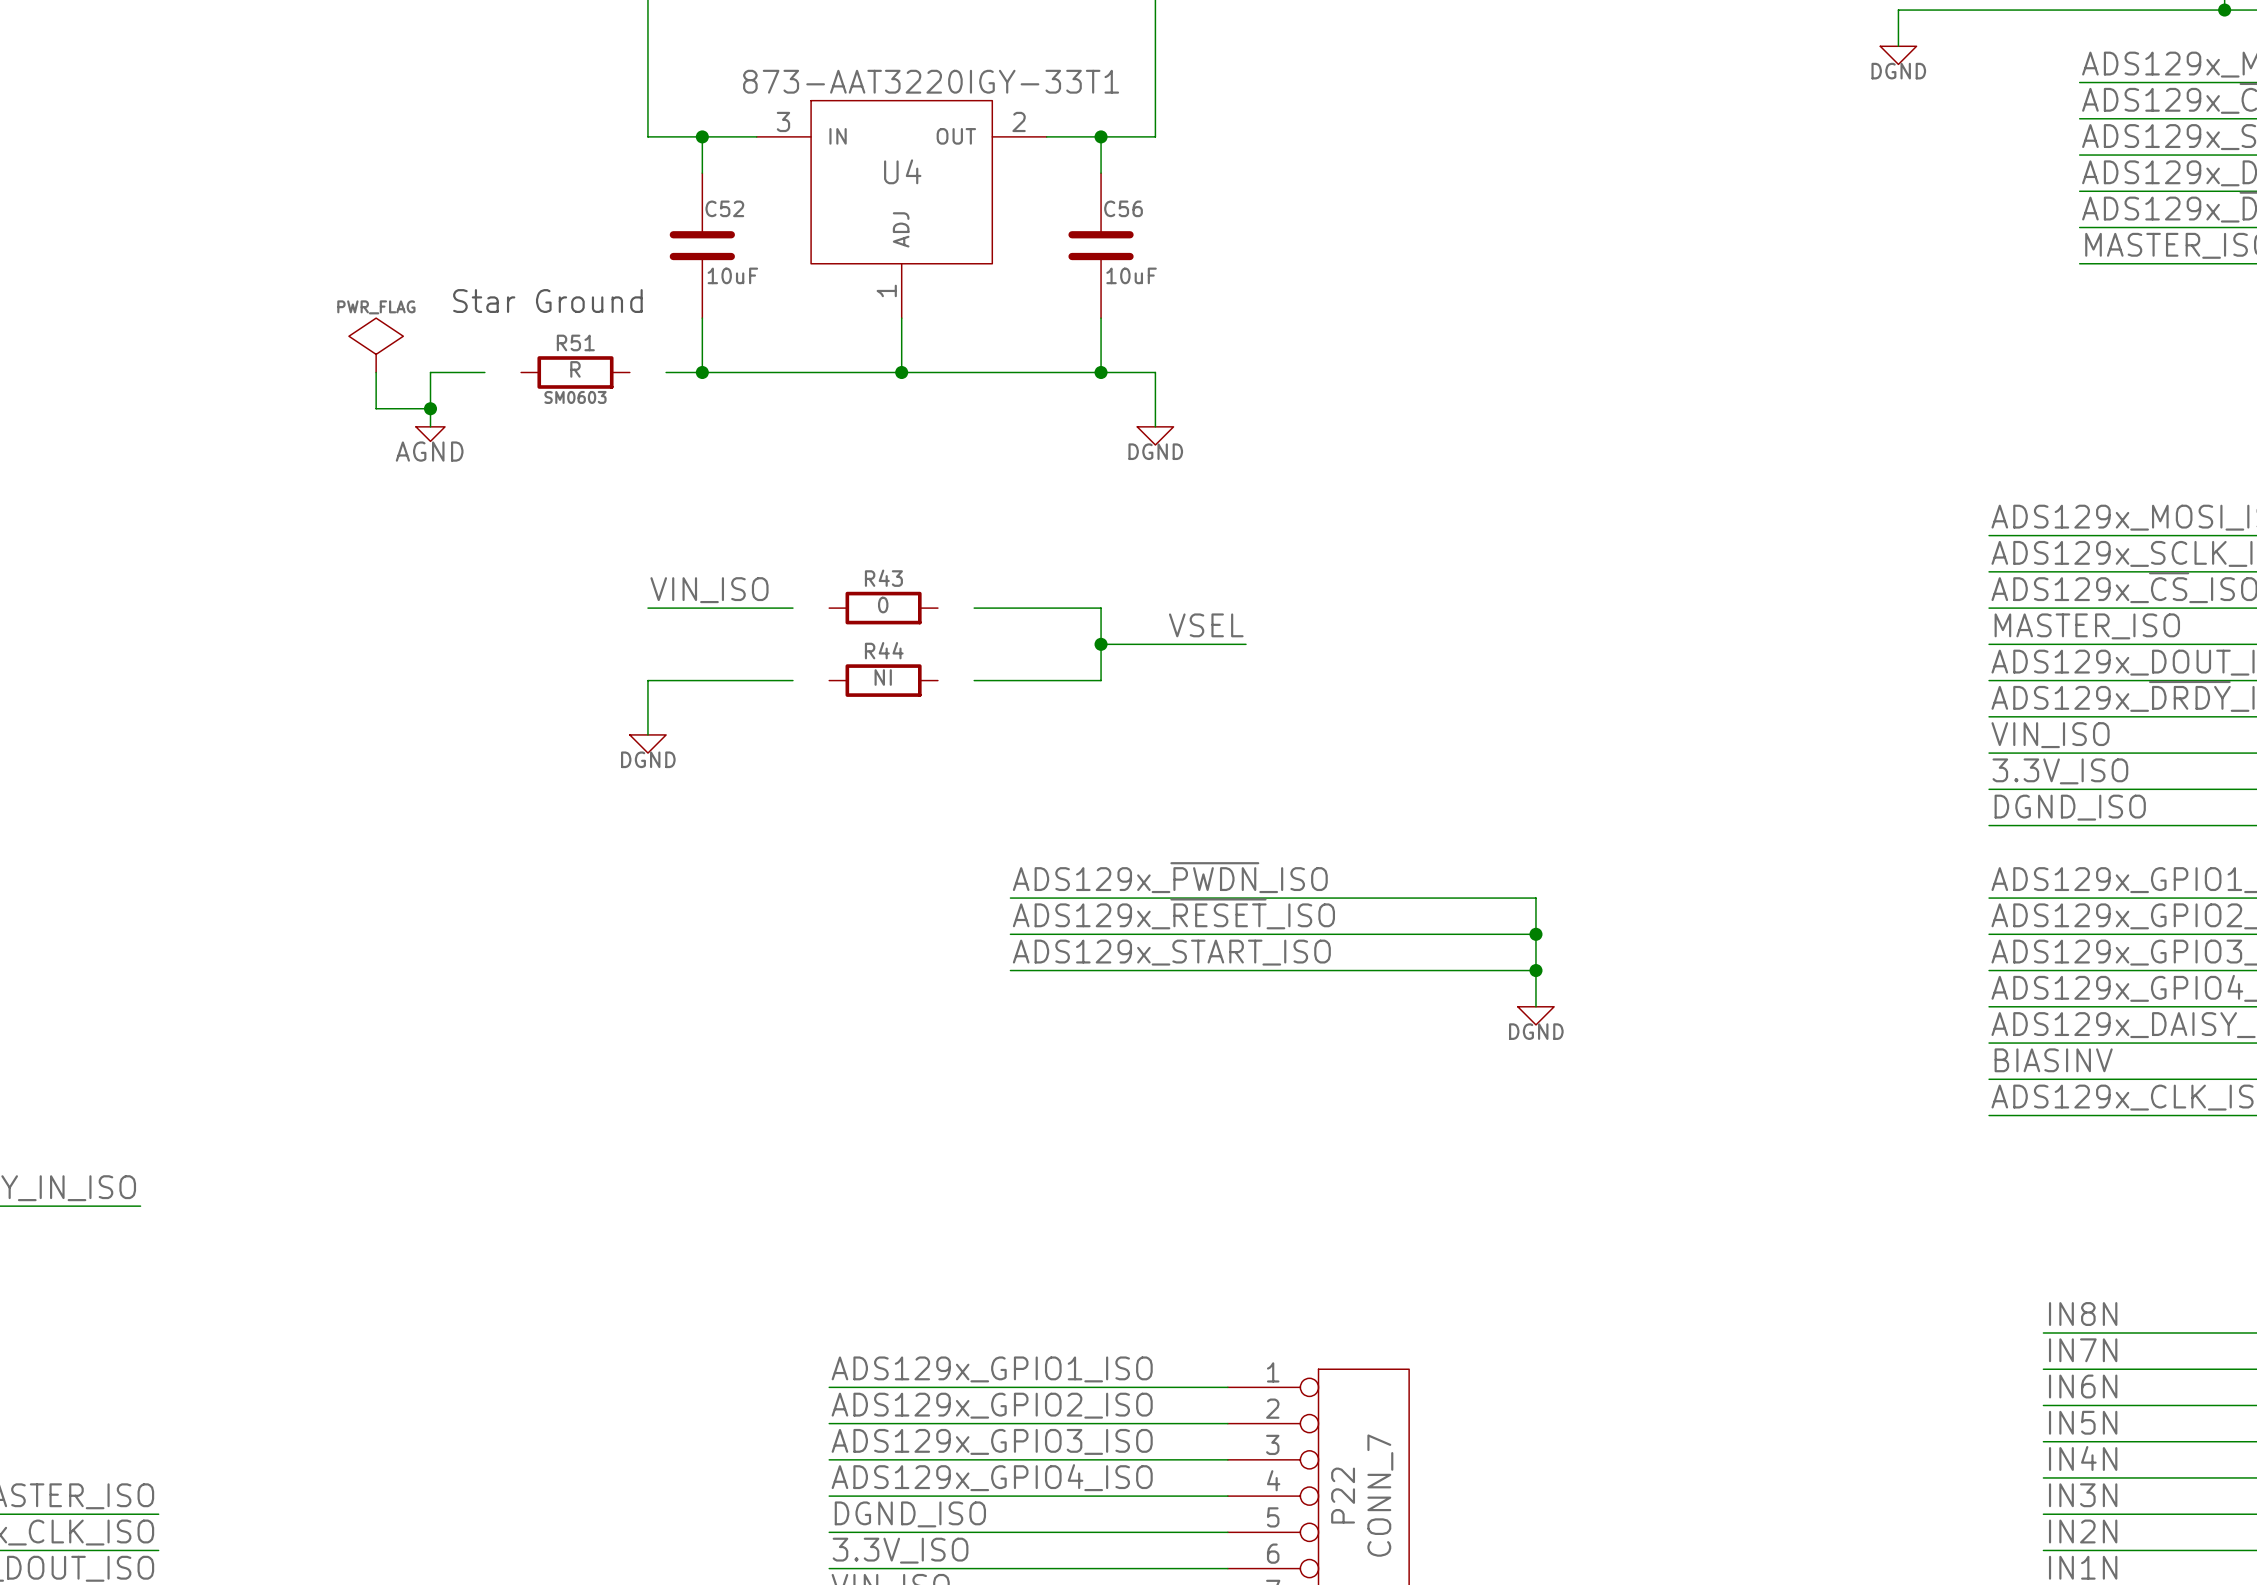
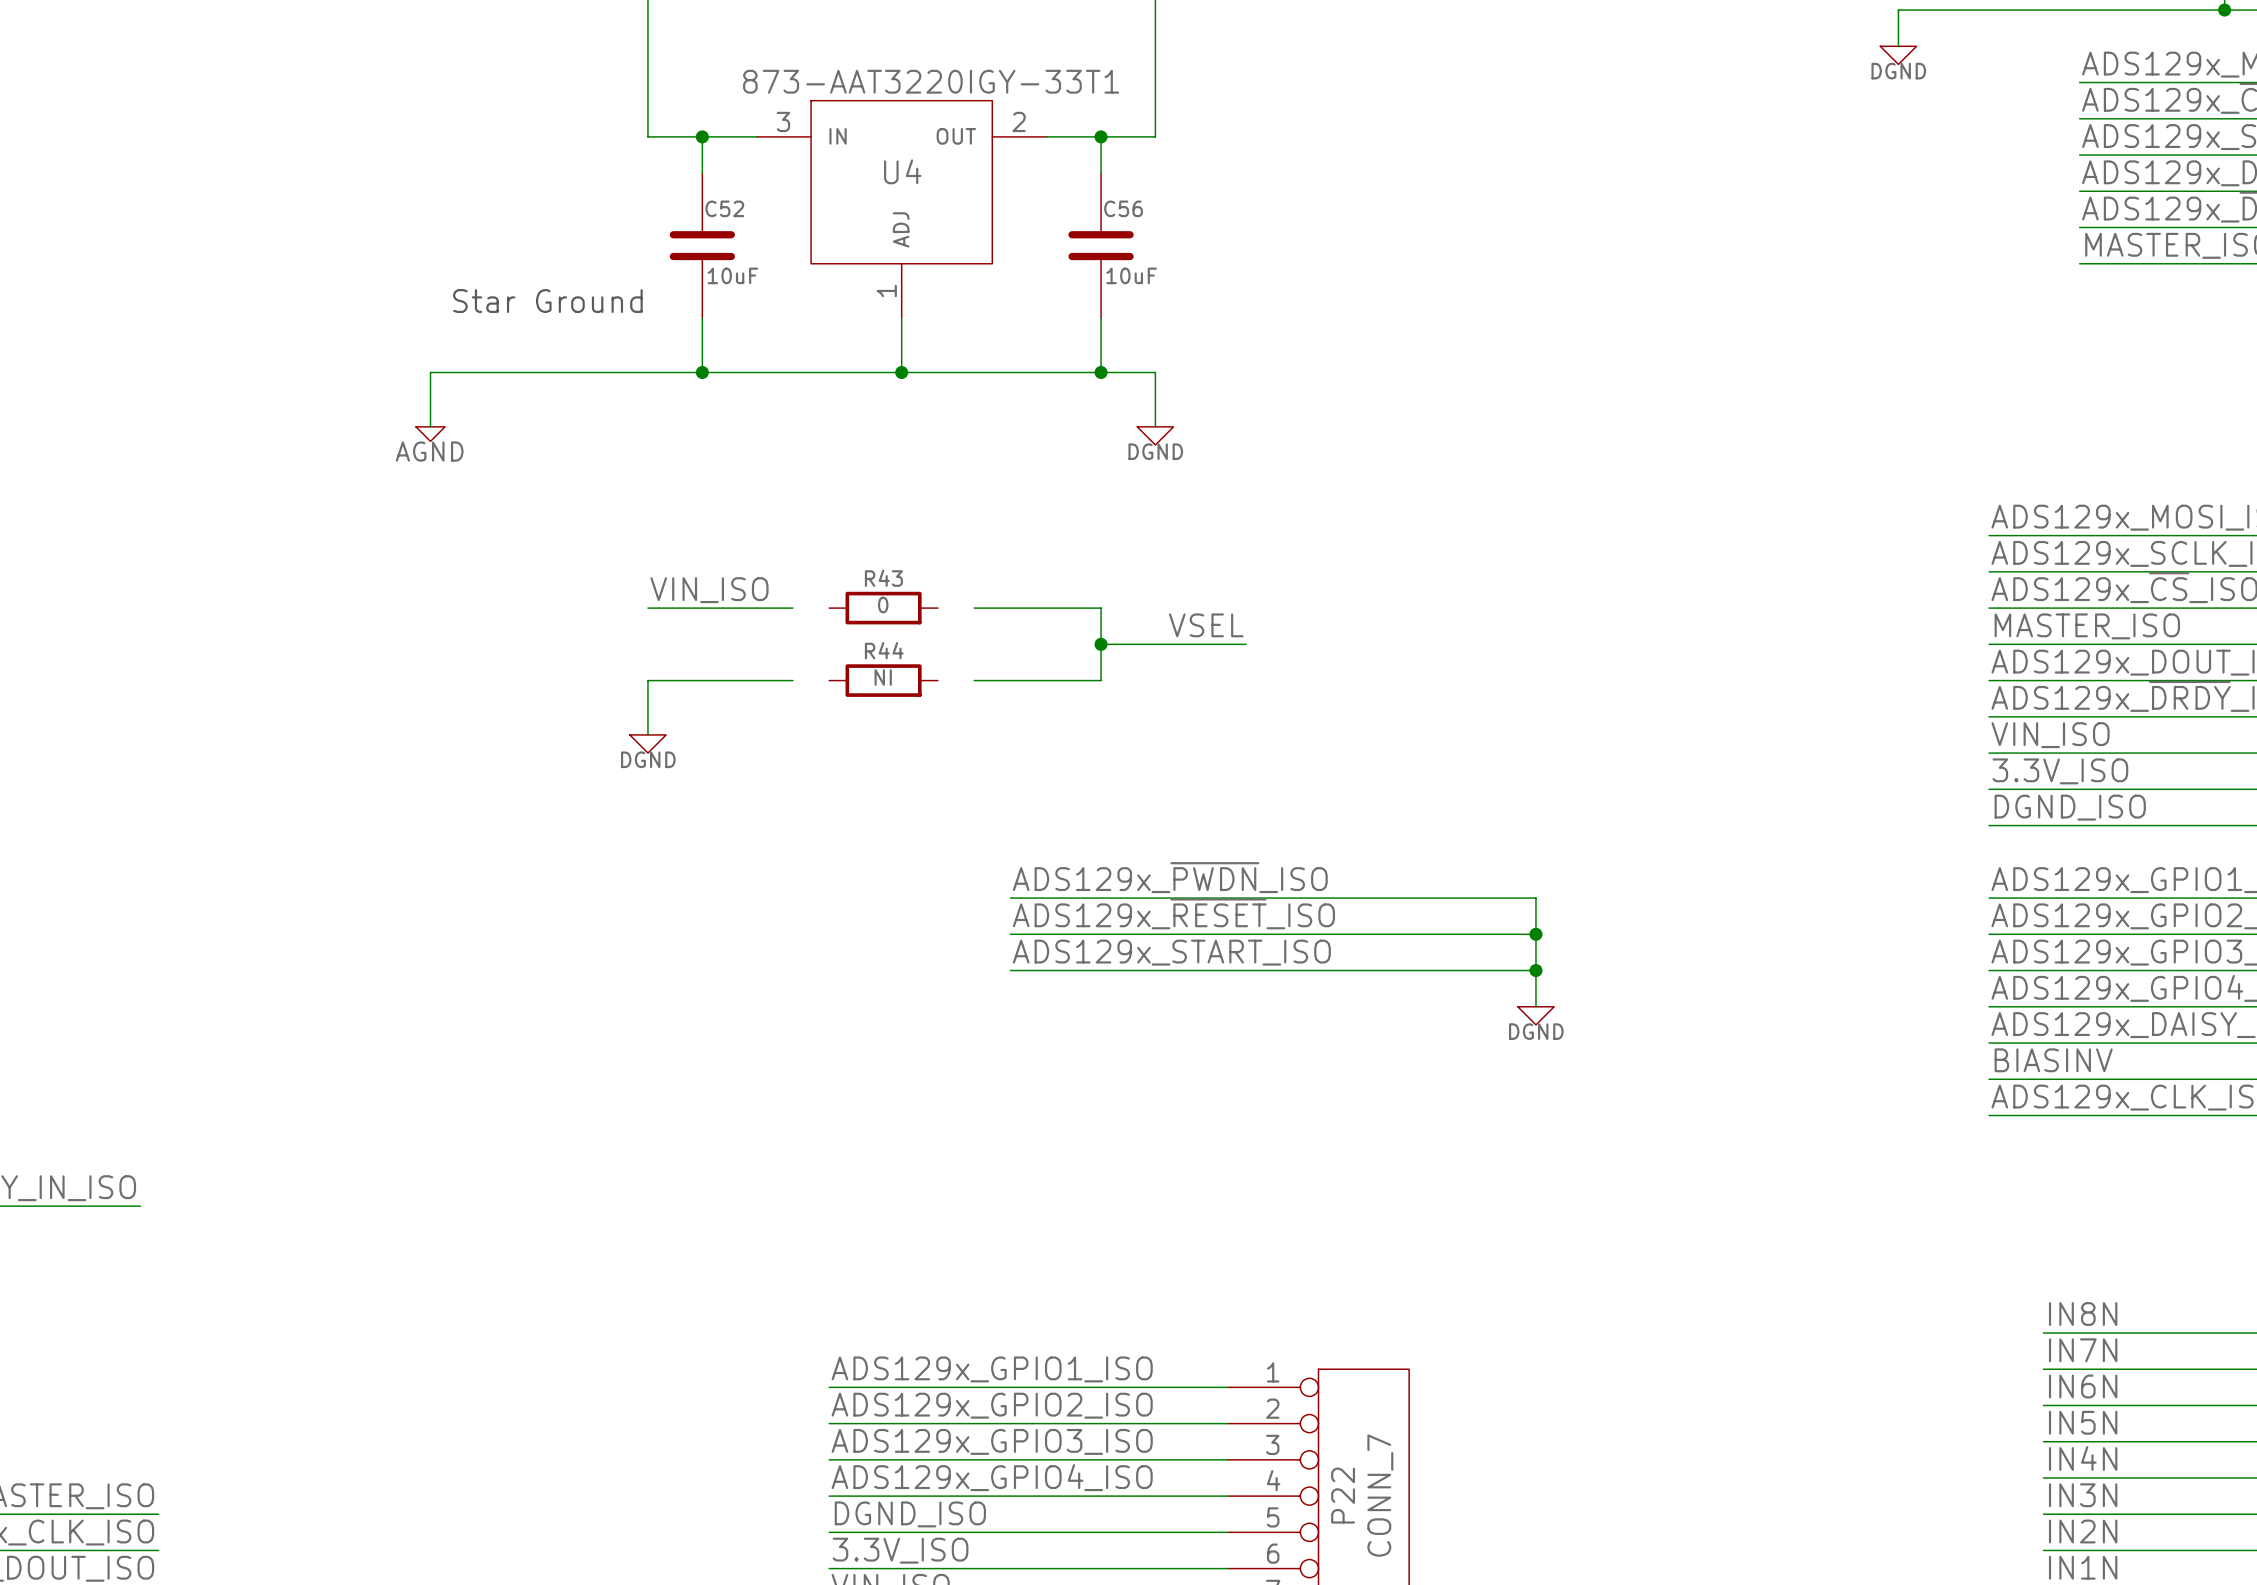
power symbol: PWR_FLAG (376, 345) -> none
wire: (376, 372) (376, 408) (430, 408) -> none
wire: none -> (484, 372) (666, 372)
R51: R (575, 372) -> none
junction: (430, 408) -> none

